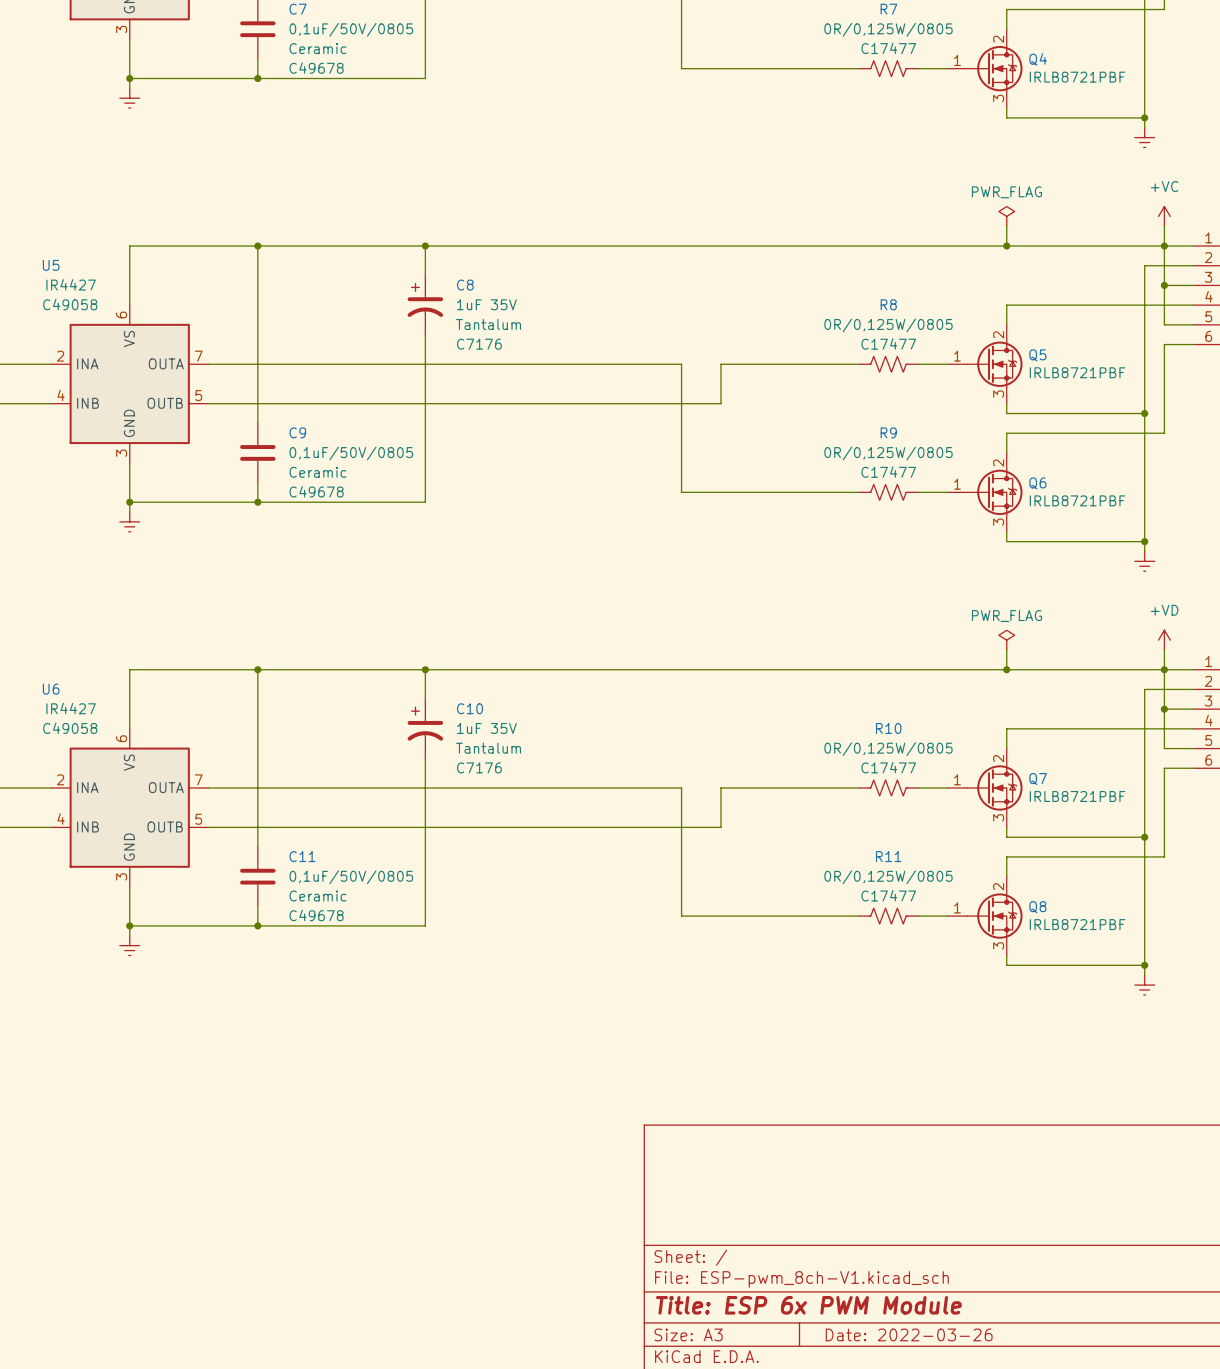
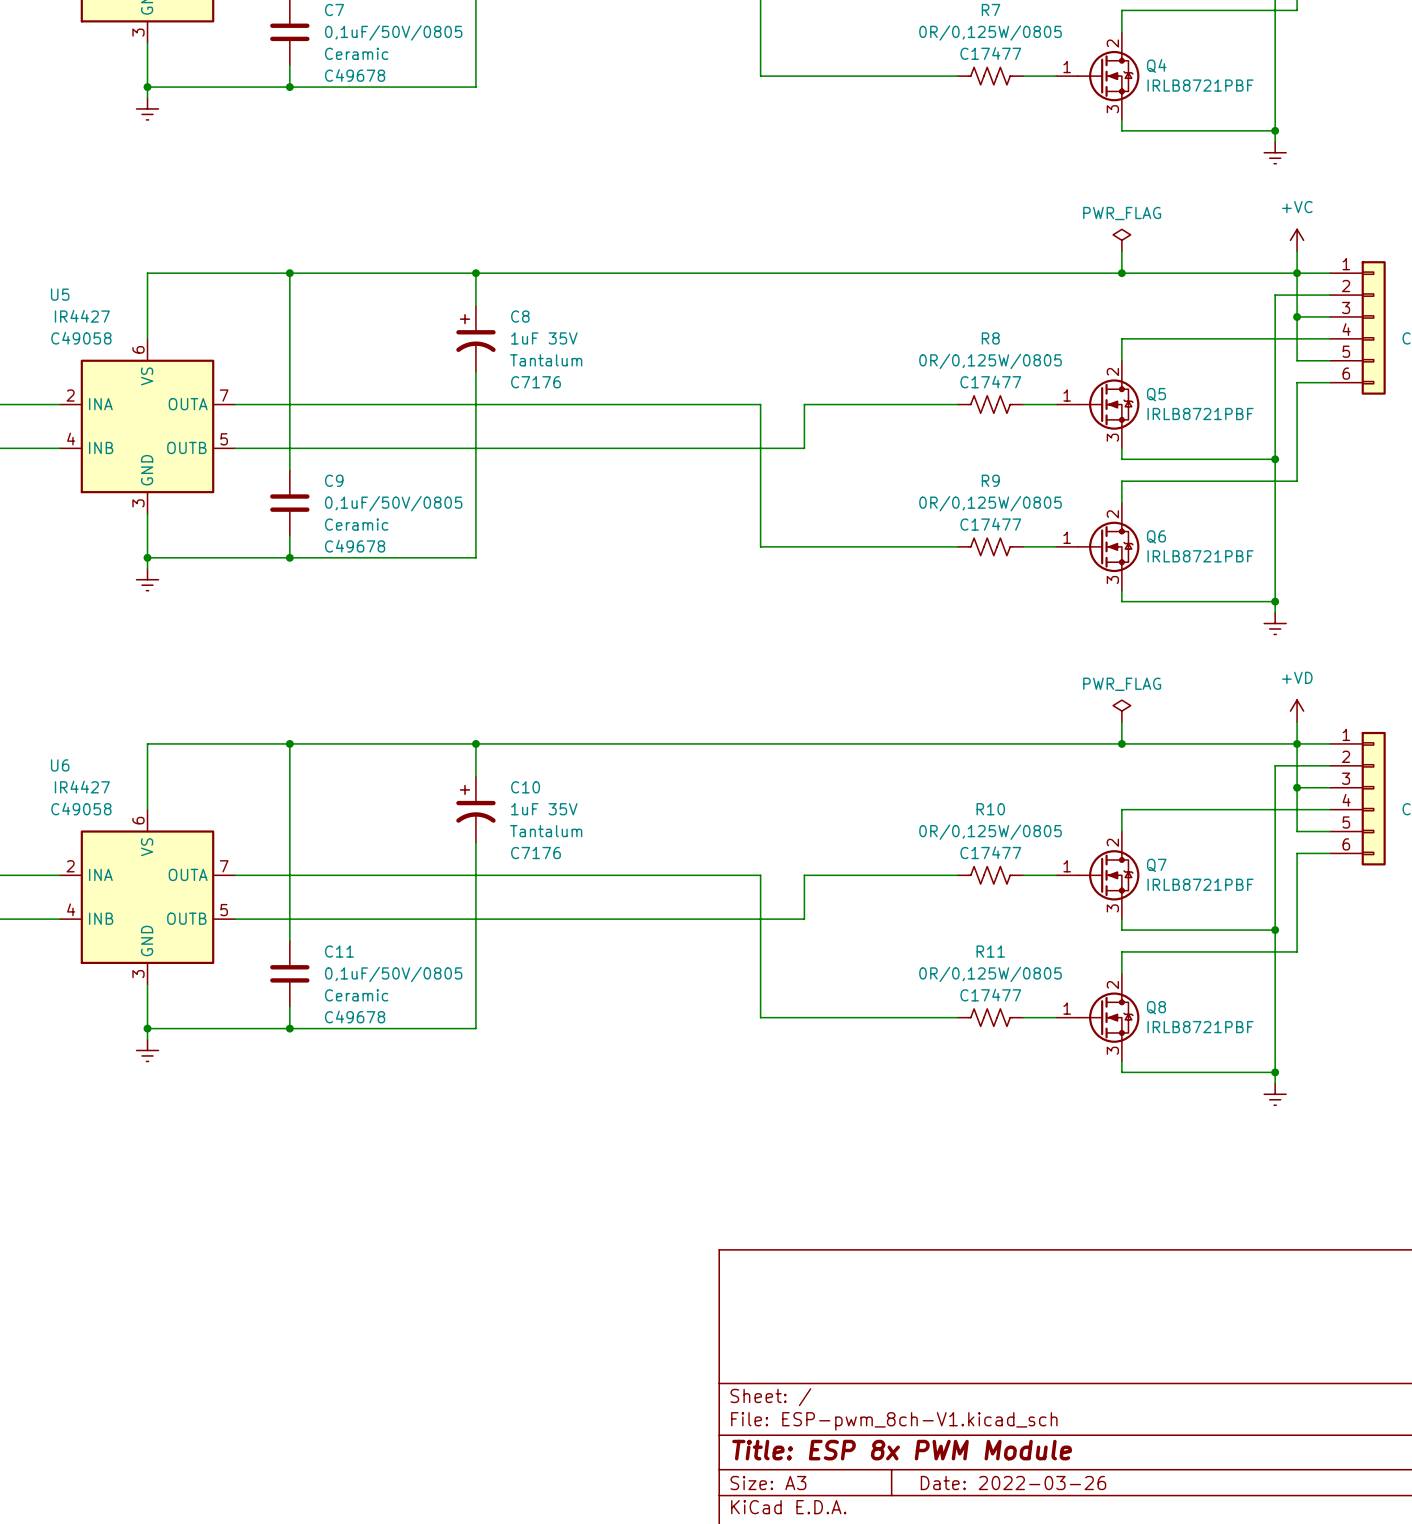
title block: Title: ESP 6x PWM Module (808, 1305) -> Title: ESP 8x PWM Module (902, 1450)

